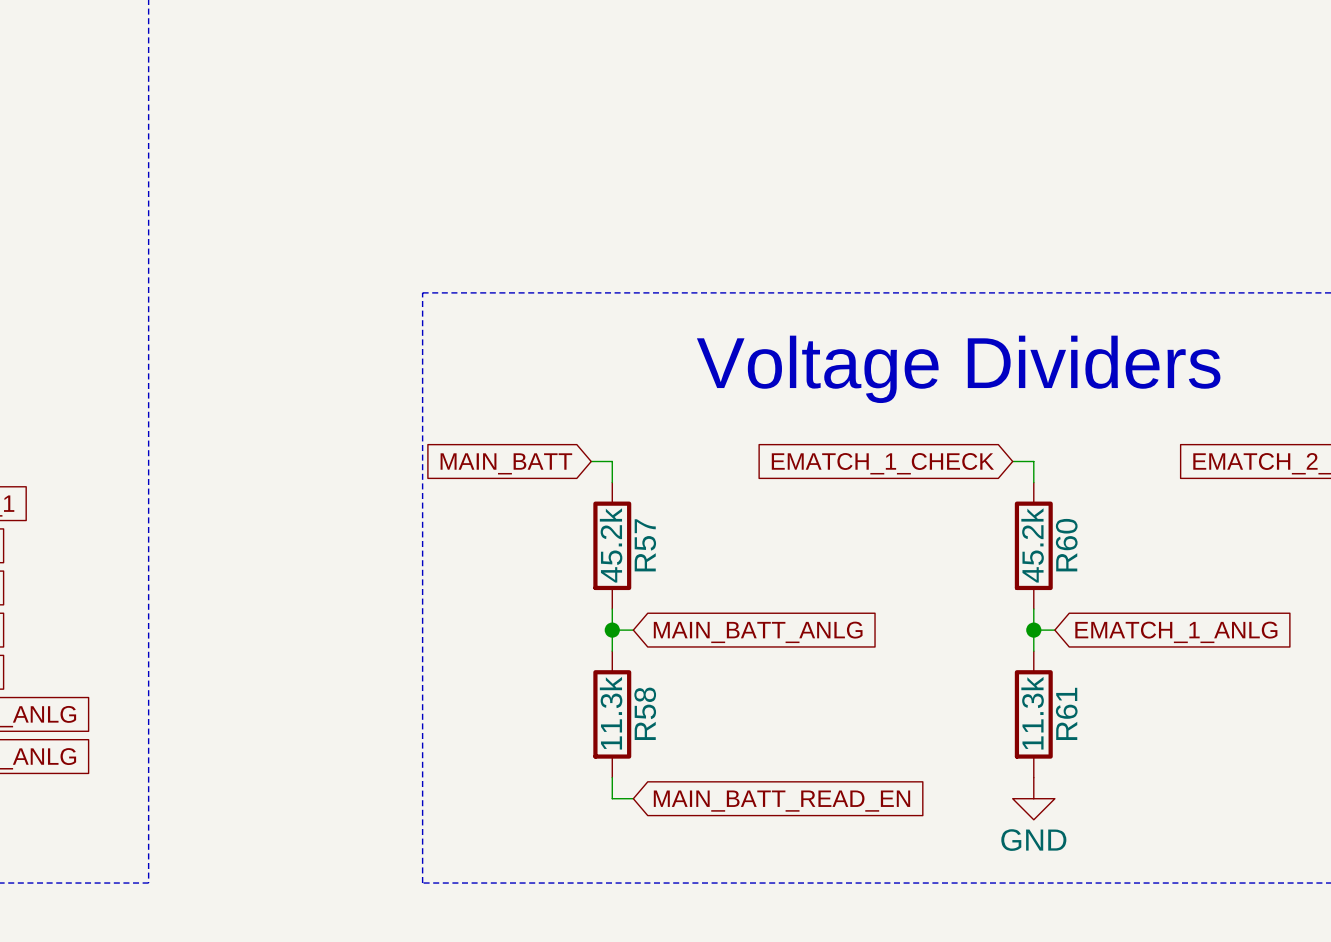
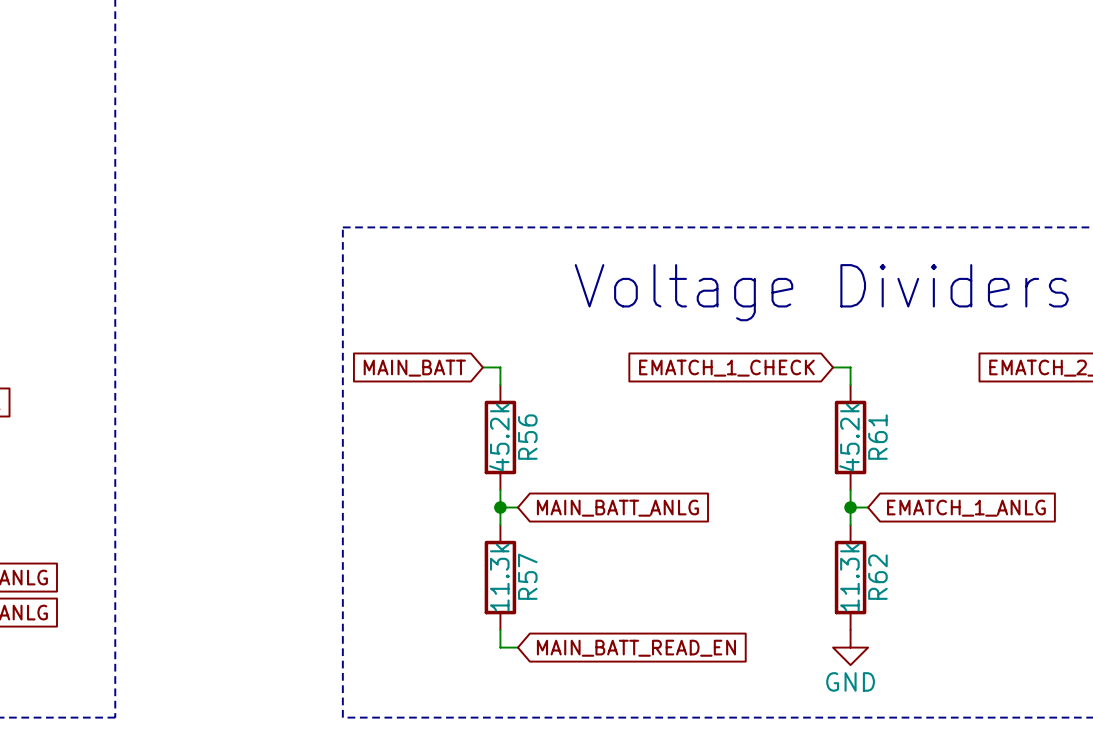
R57 name: R57 (645, 545) -> R56 (527, 437)
R60 name: R60 (1066, 545) -> R61 (877, 437)
R58 name: R58 (645, 713) -> R57 (527, 576)
R61 name: R61 (1066, 713) -> R62 (877, 577)

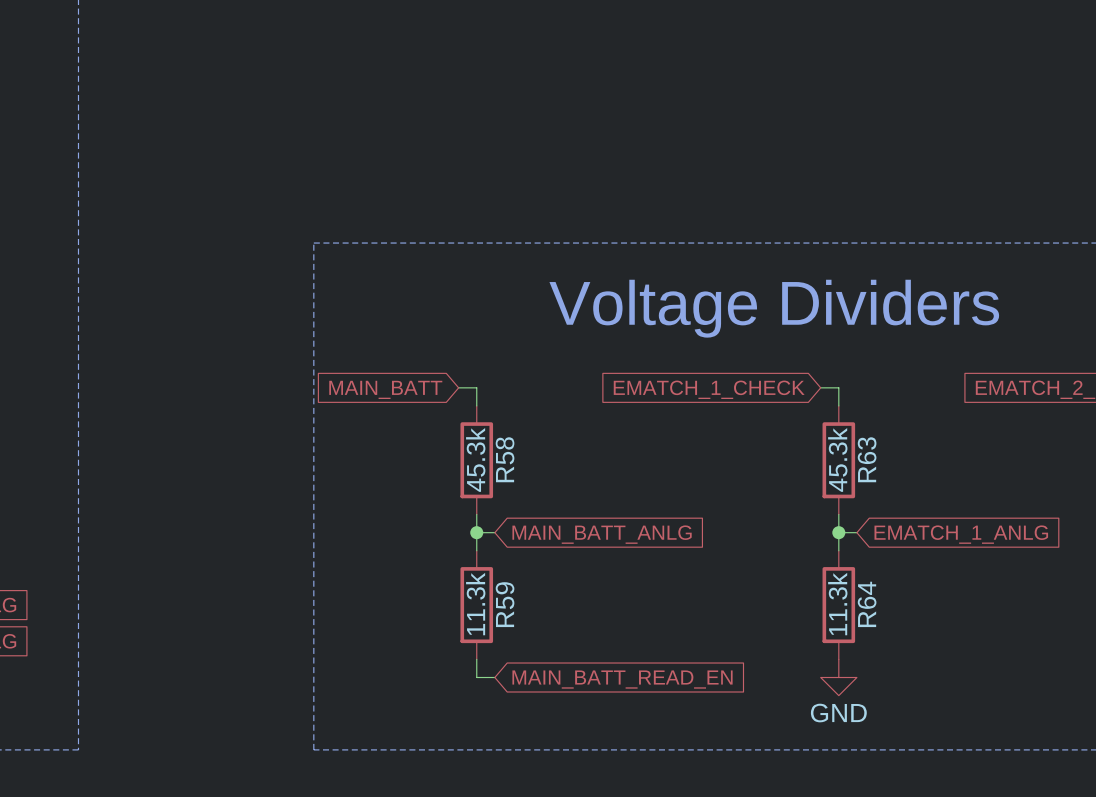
R56 value: 45.2k (499, 437) -> 45.3k (475, 459)
R56 name: R56 (527, 437) -> R58 (505, 459)
R61 value: 45.2k (849, 437) -> 45.3k (837, 459)
R61 name: R61 (877, 437) -> R63 (867, 459)
R57 name: R57 (527, 576) -> R59 (505, 604)
R62 name: R62 (877, 577) -> R64 (867, 604)

